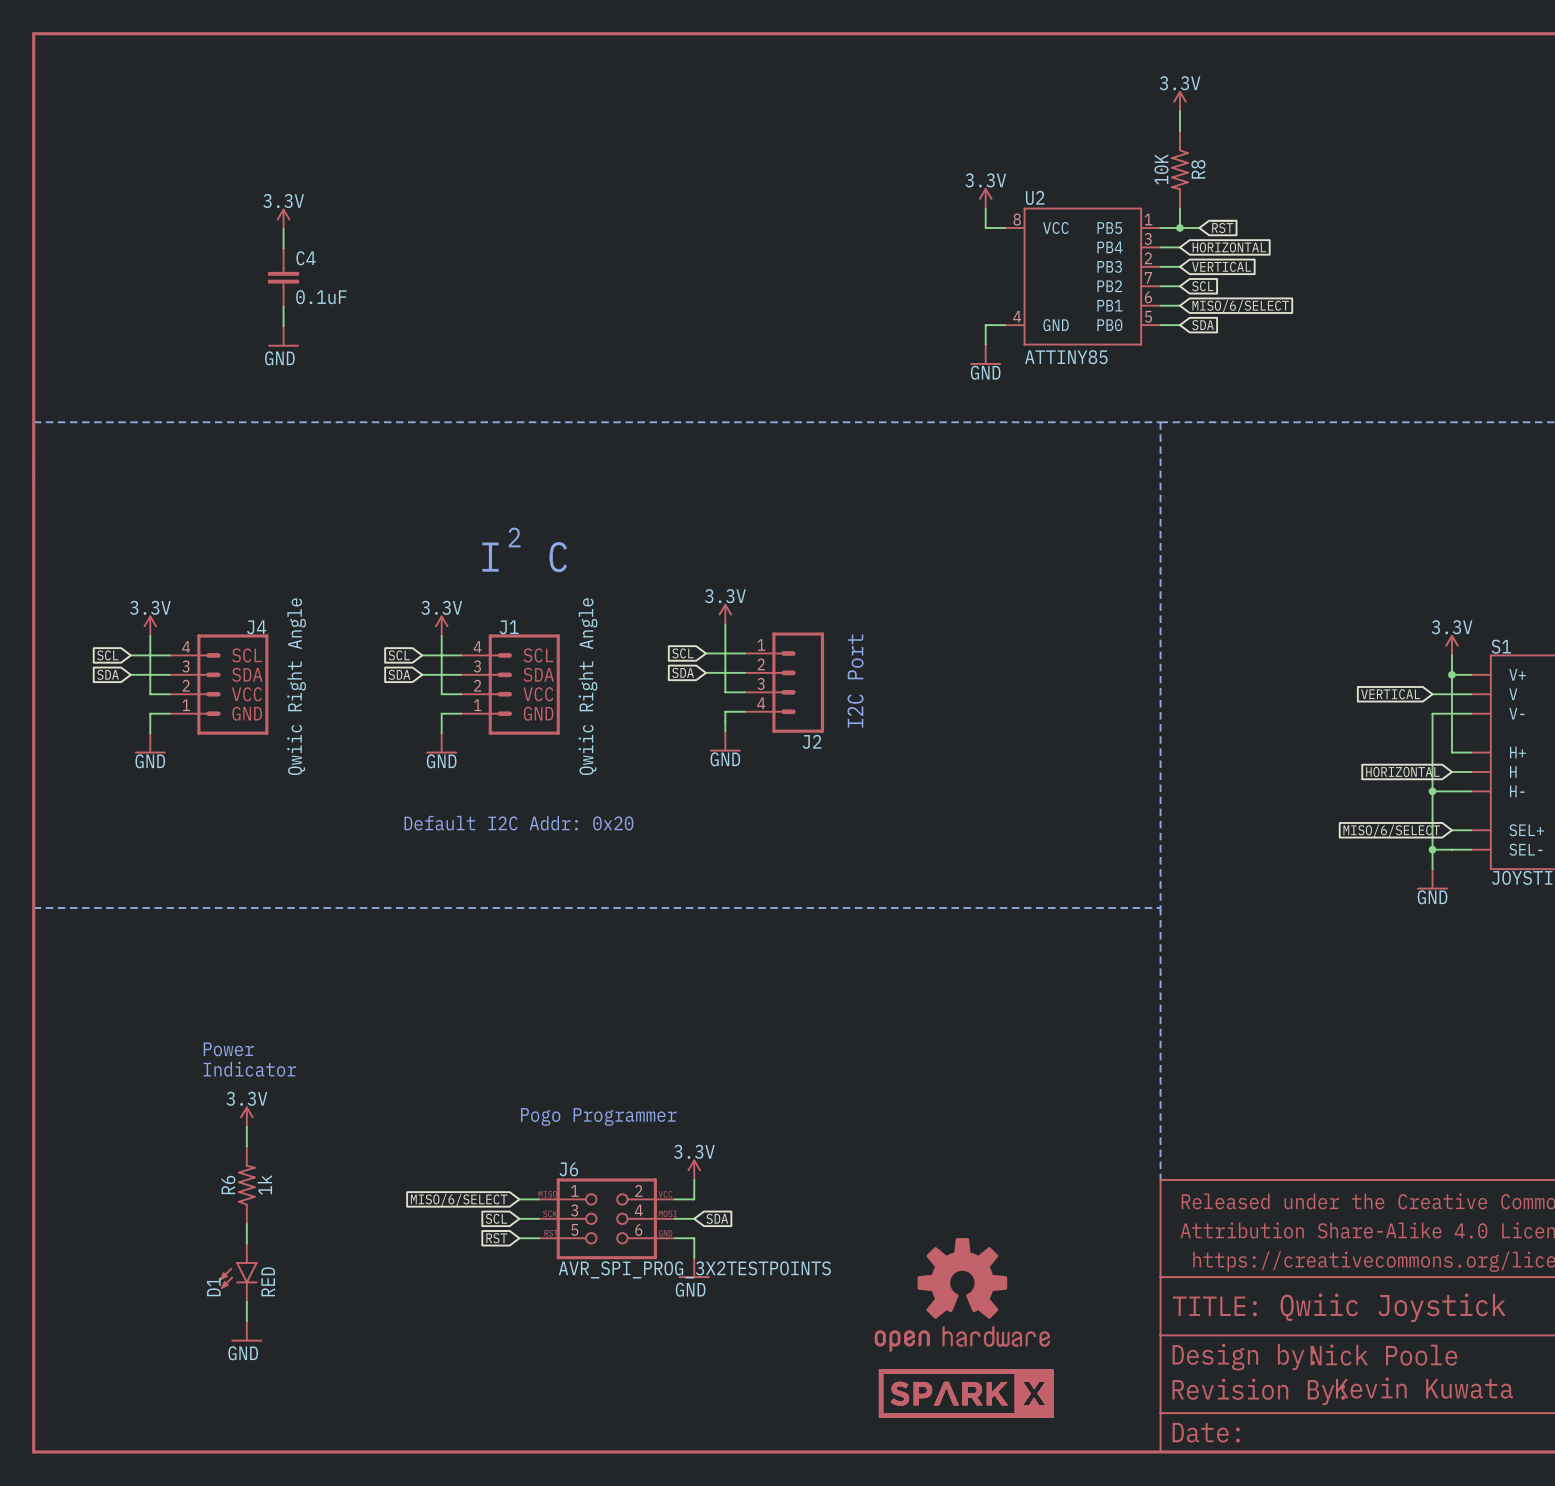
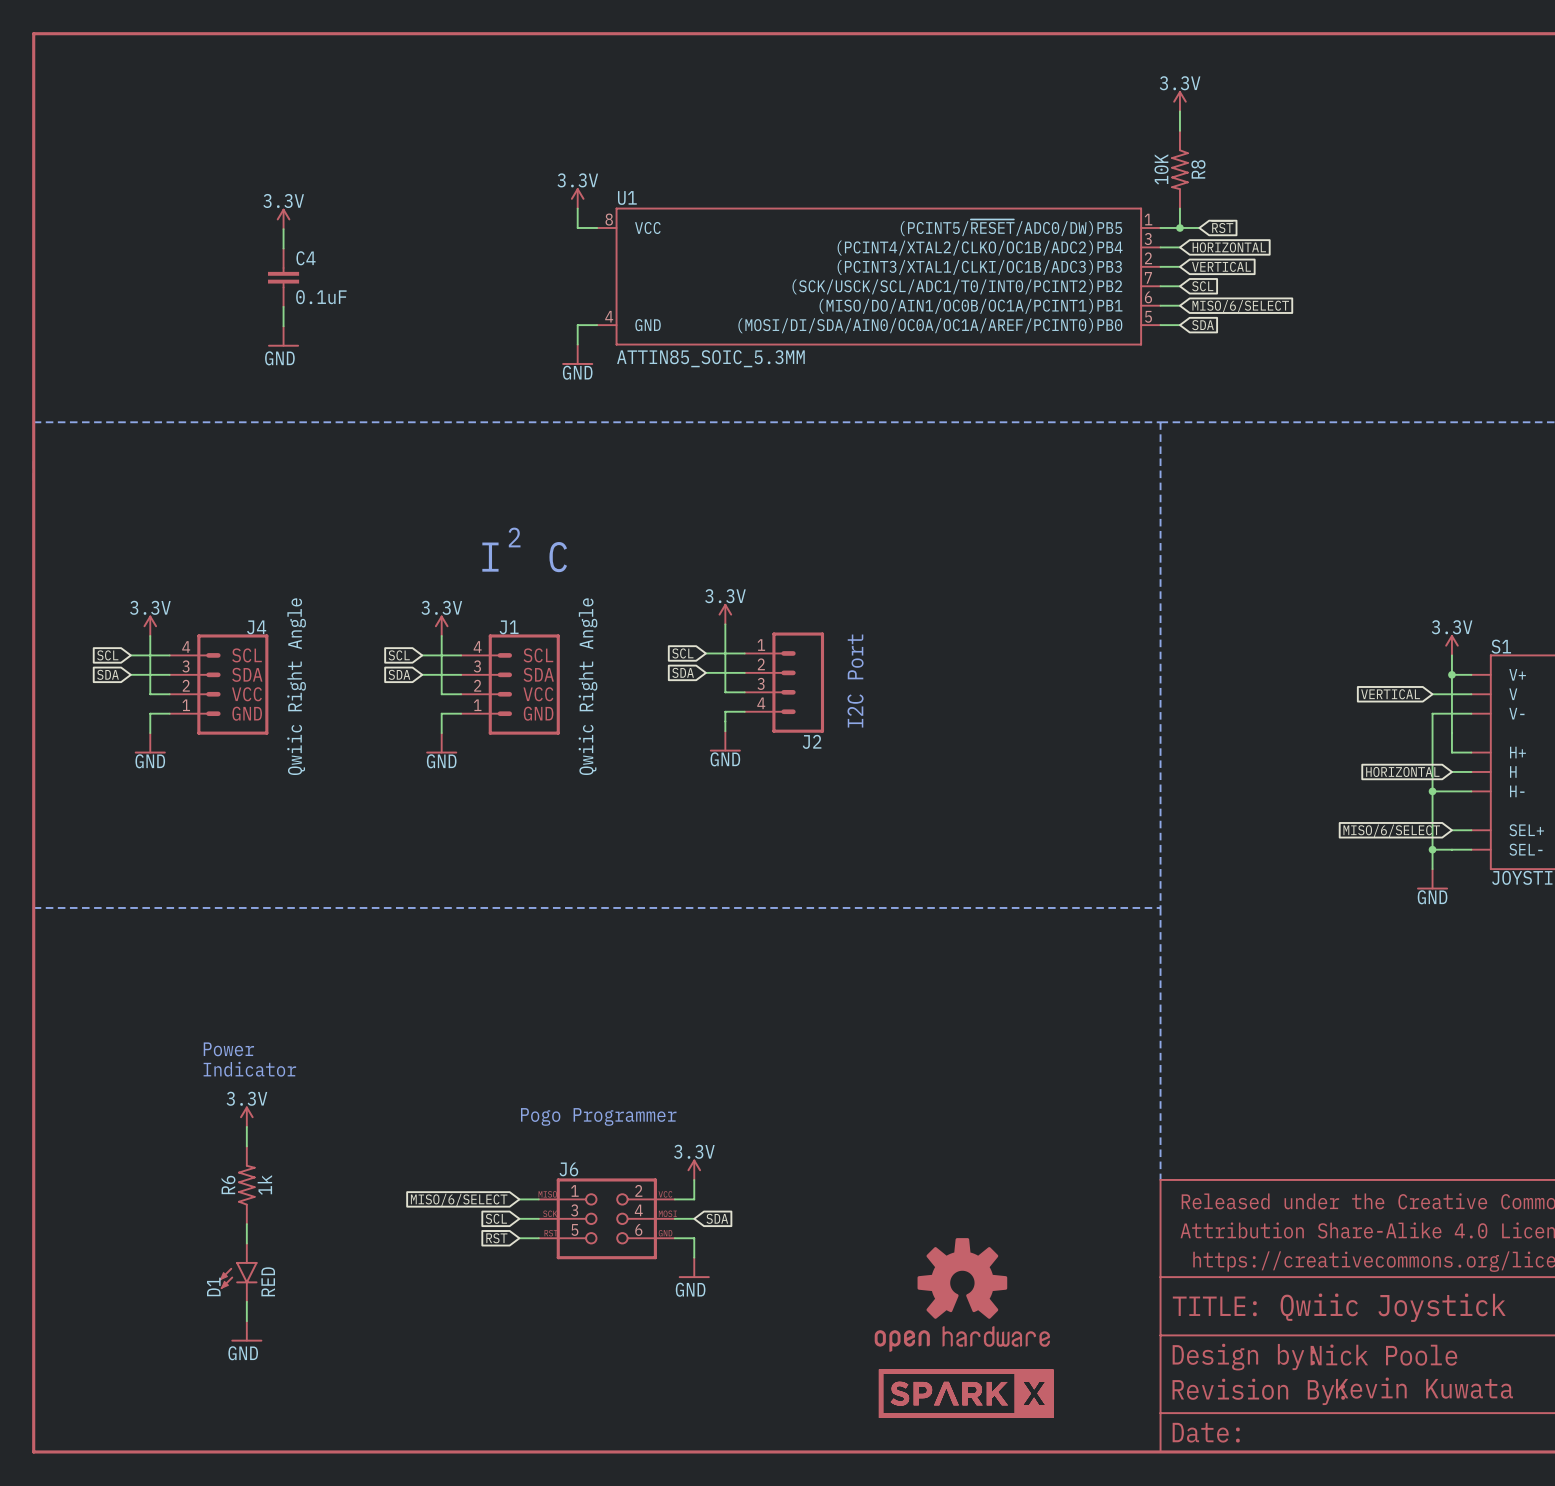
power symbol: none -> 3.3V (577, 198)
power symbol: 3.3V (985, 198) -> none
wire: none -> (577, 208) (577, 227) (597, 227)
wire: (985, 208) (985, 227) (1005, 227) -> none
U1: none -> ATTIN85_SOIC_5.3MM (878, 276)
U2: ATTINY85 (1082, 276) -> none
wire: none -> (597, 325) (577, 325) (577, 344)
wire: (1005, 325) (985, 325) (985, 344) -> none
power symbol: none -> GND (577, 354)
power symbol: GND (985, 354) -> none
text: Default I2C Addr: 0x20 (518, 823) -> none
J6 value: AVR_SPI_PROG_3X2TESTPOINTS (694, 1269) -> none

